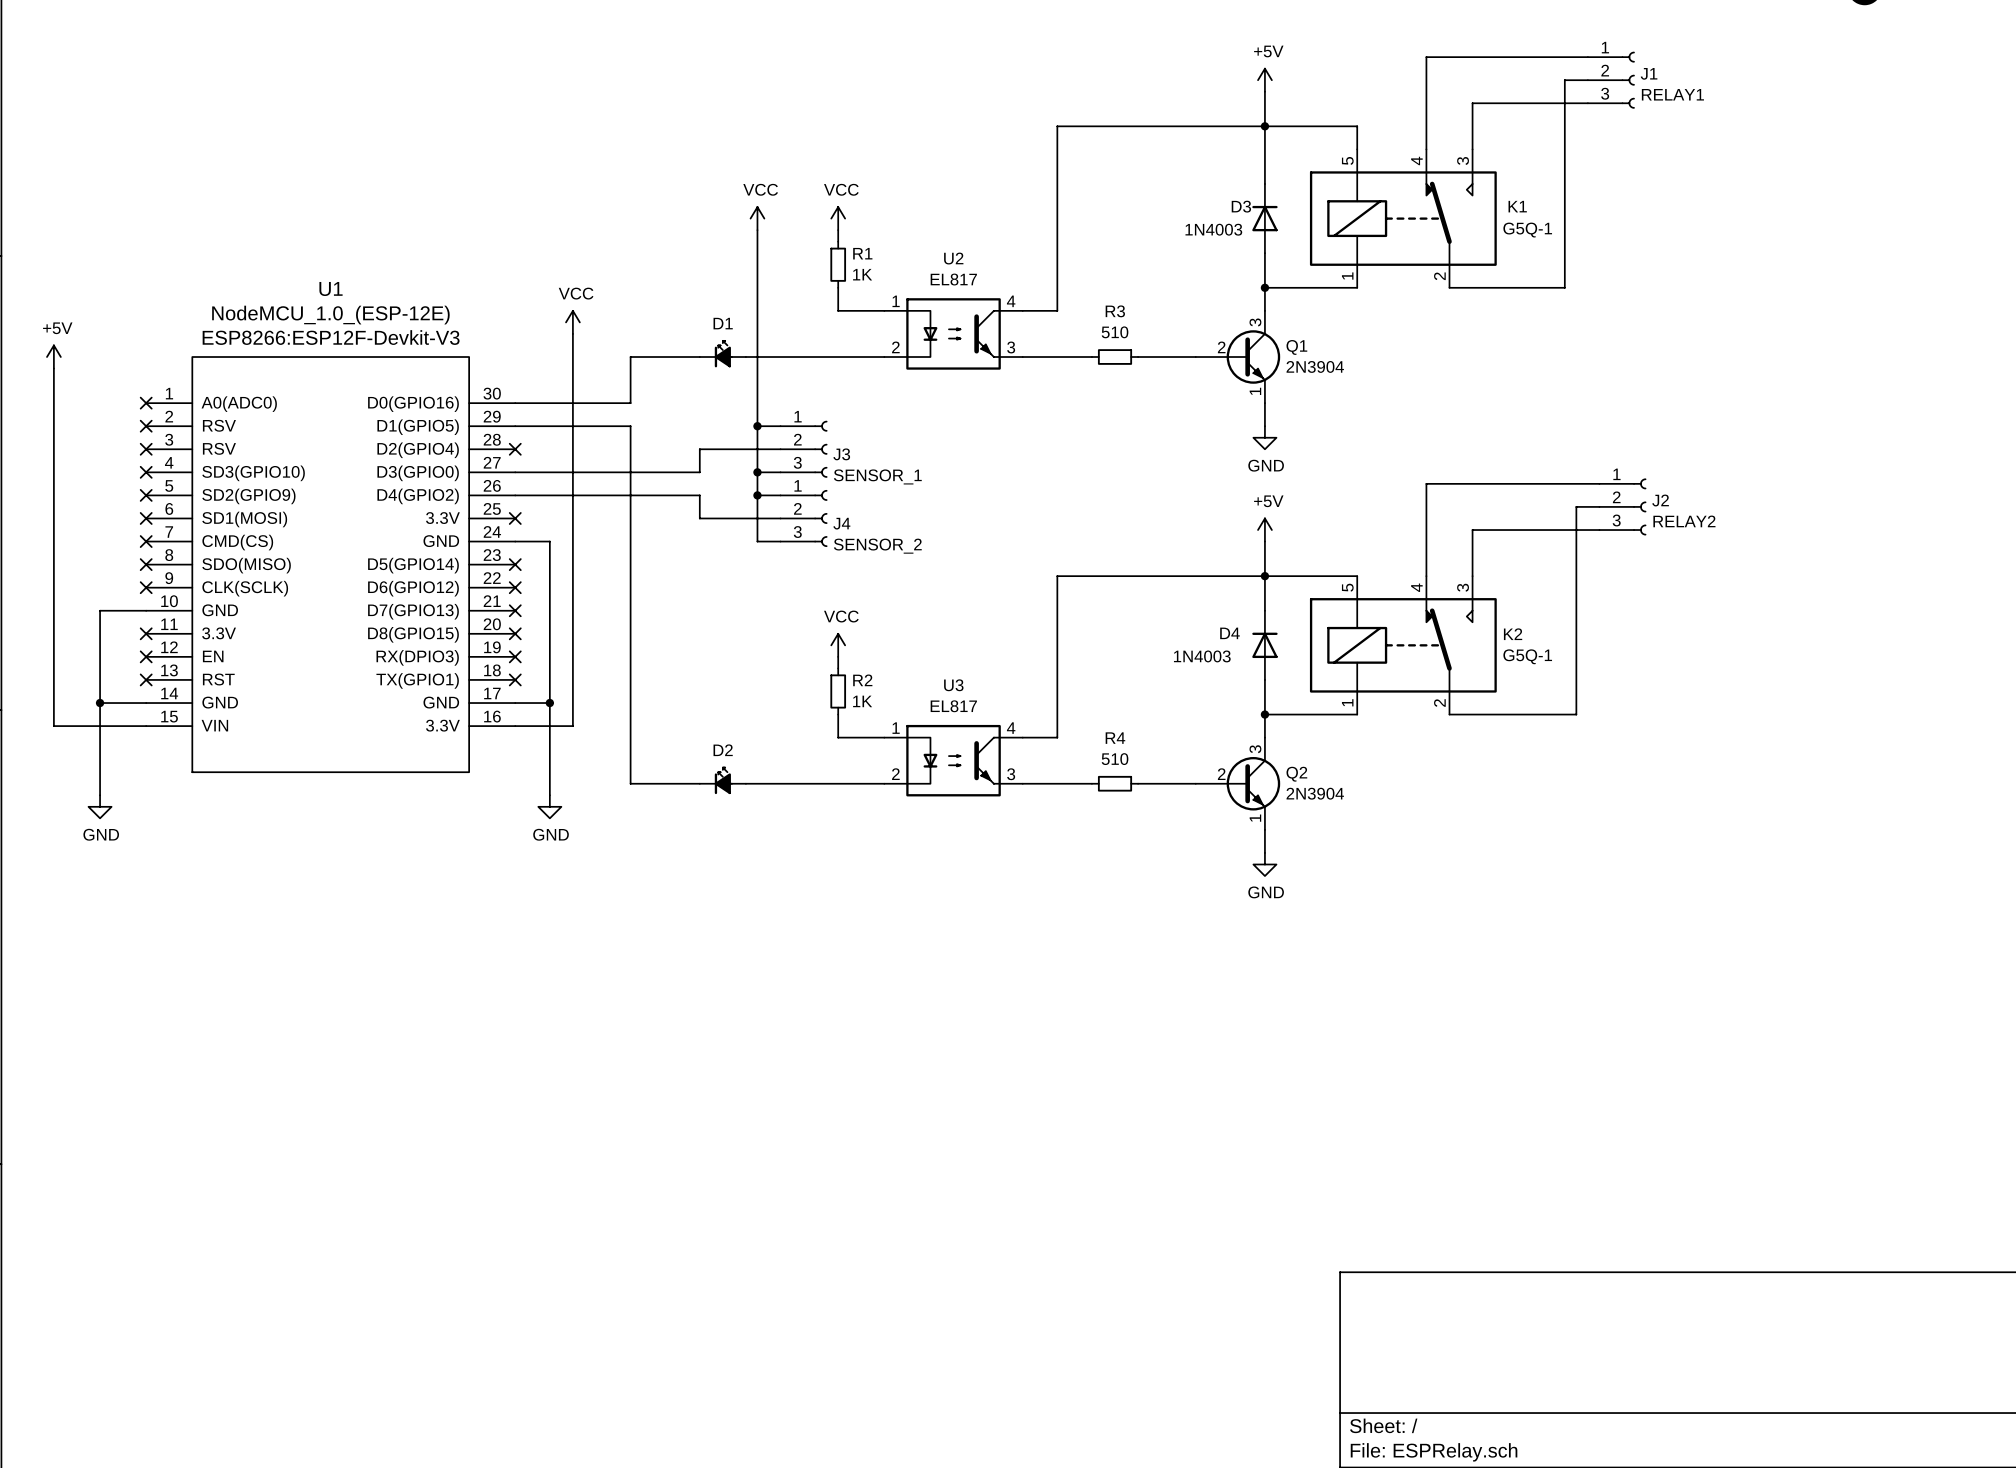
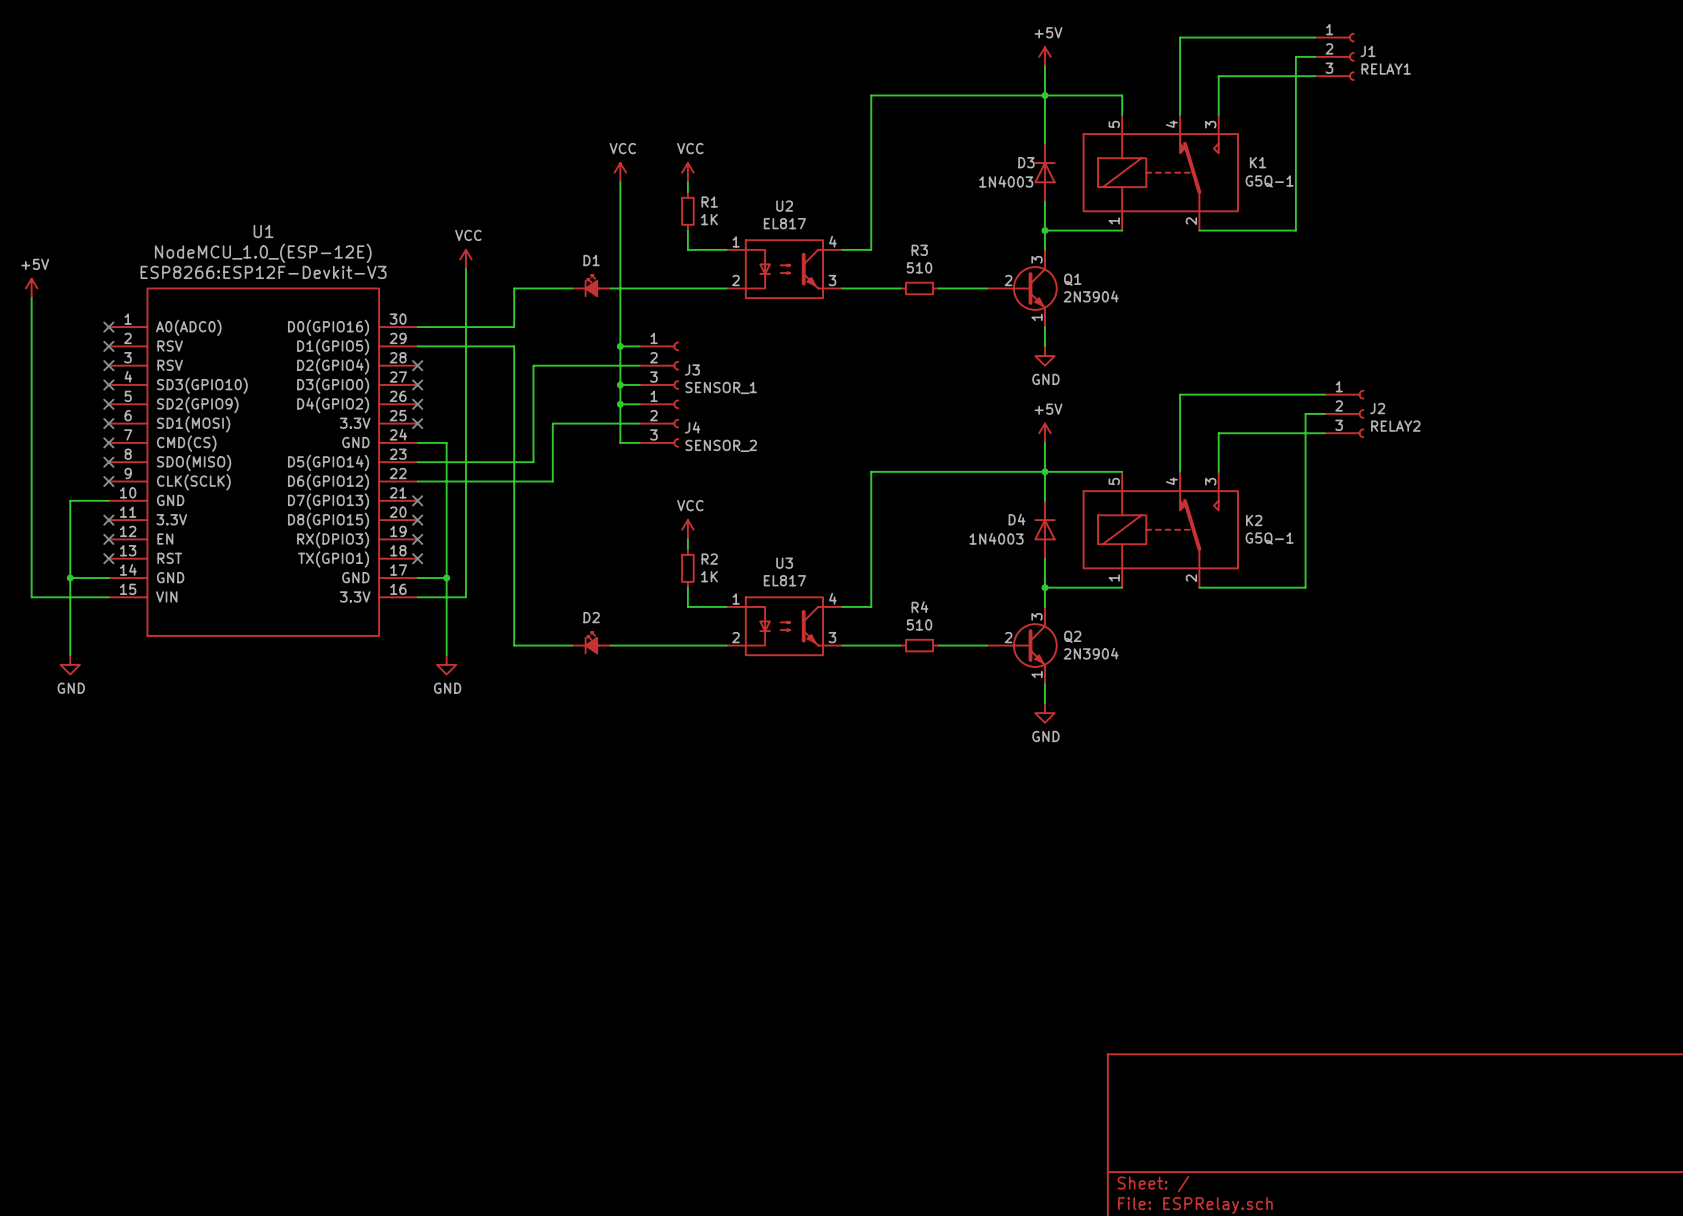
wire: (699, 449) (699, 472) (515, 472) -> (572, 365) (533, 365) (533, 462) (417, 462)
no-connect mark: none -> (417, 384)
wire: (515, 495) (699, 495) (699, 518) -> (417, 481) (552, 481) (552, 423) (572, 423)
no-connect mark: none -> (417, 404)
no-connect mark: (515, 564) -> none
no-connect mark: (515, 587) -> none

